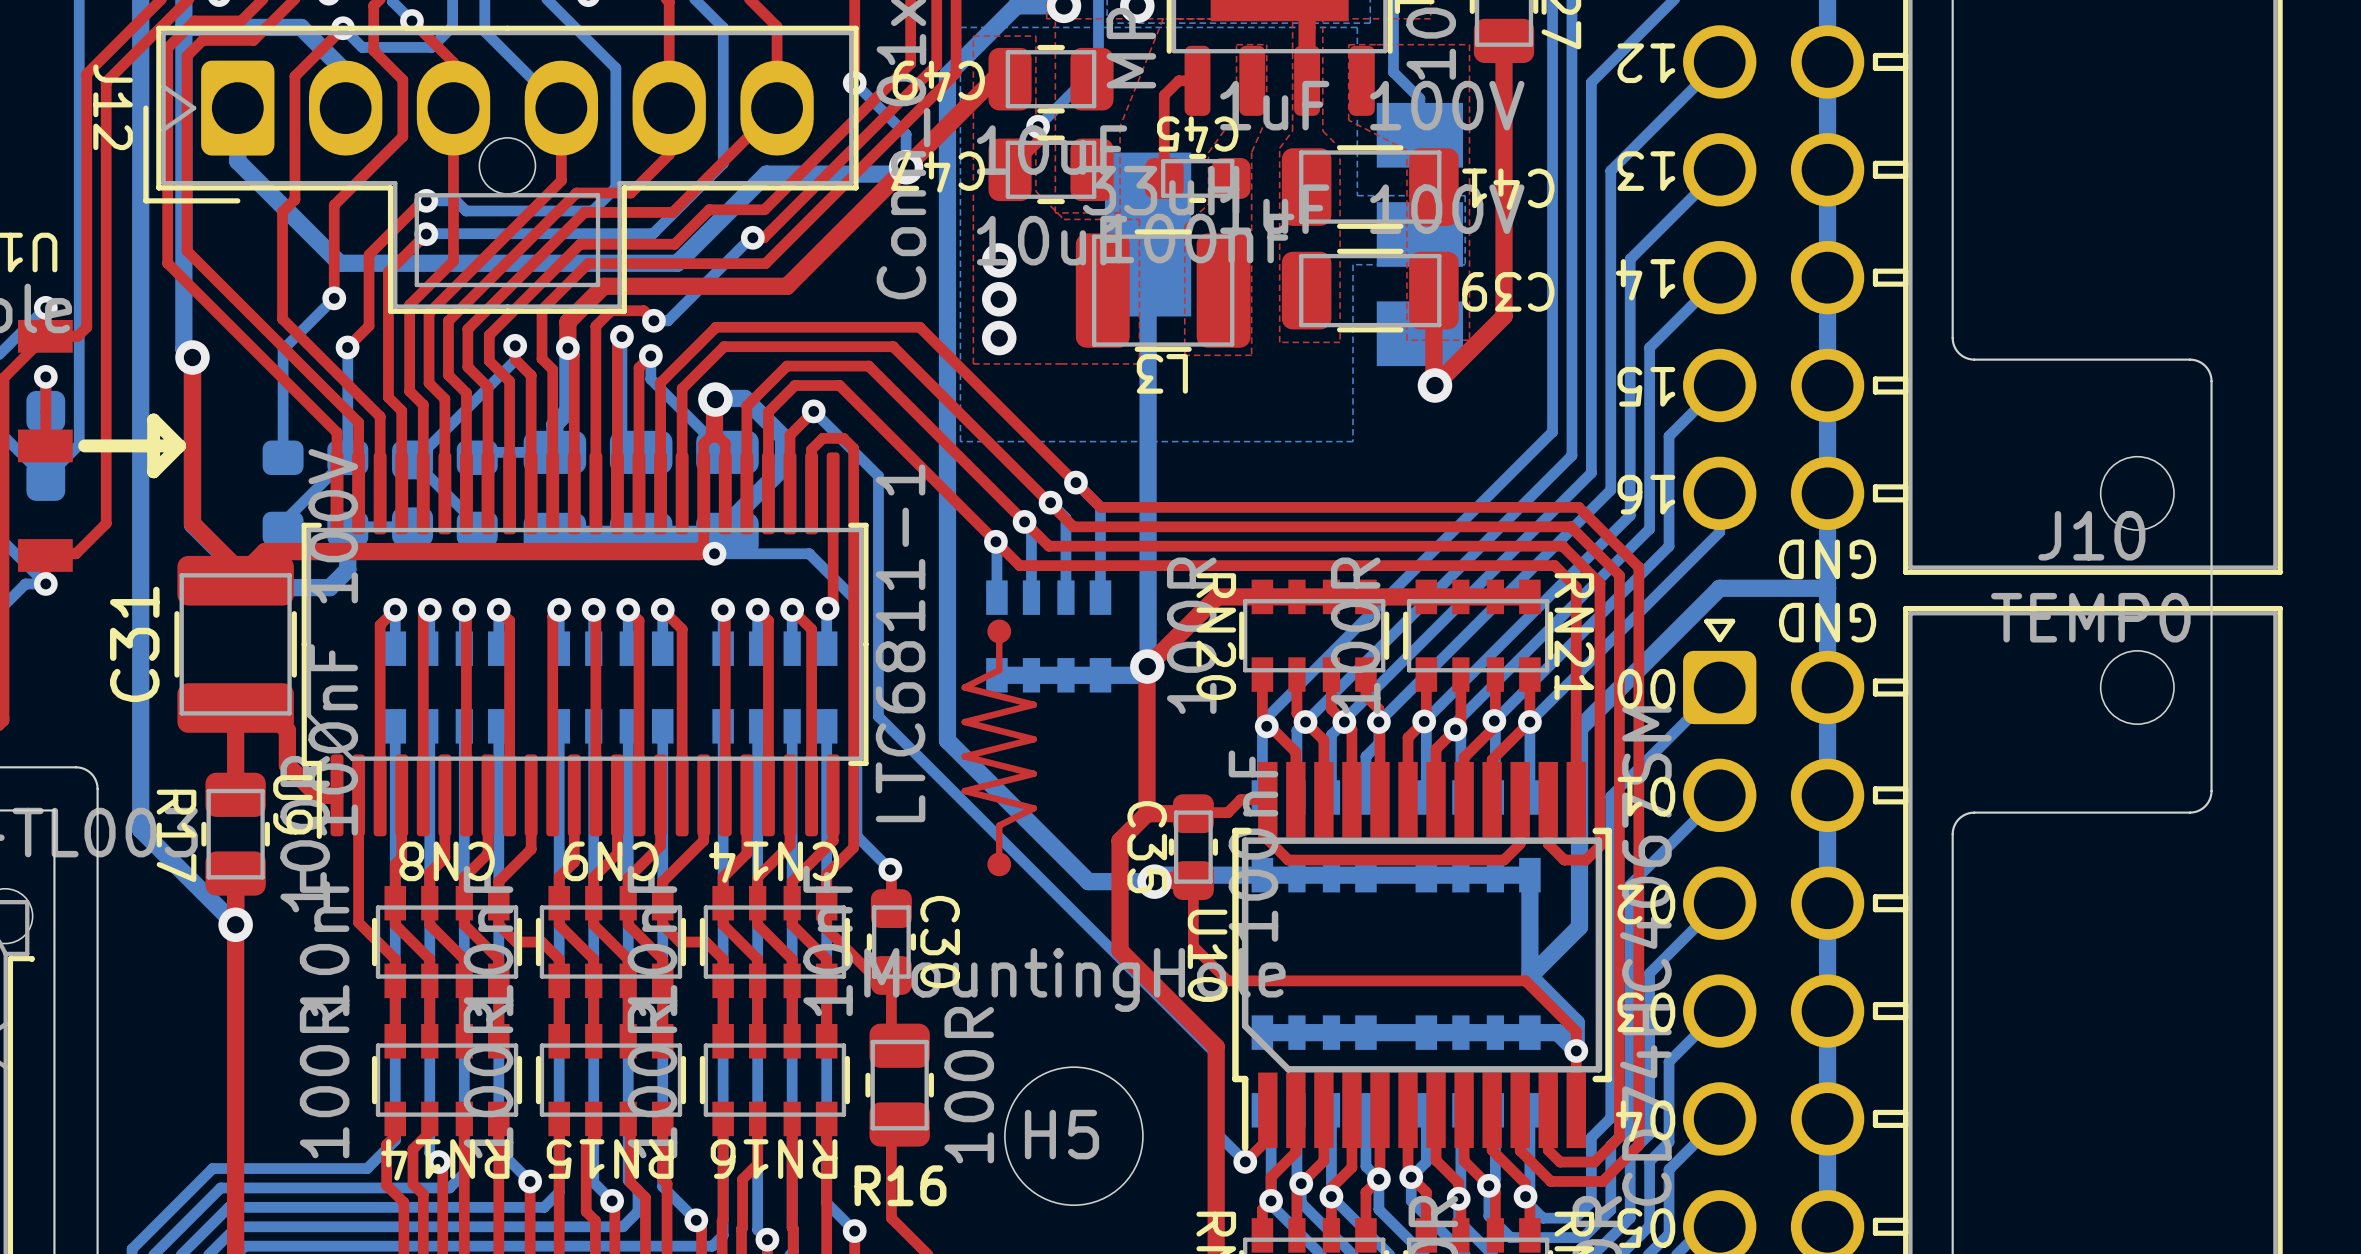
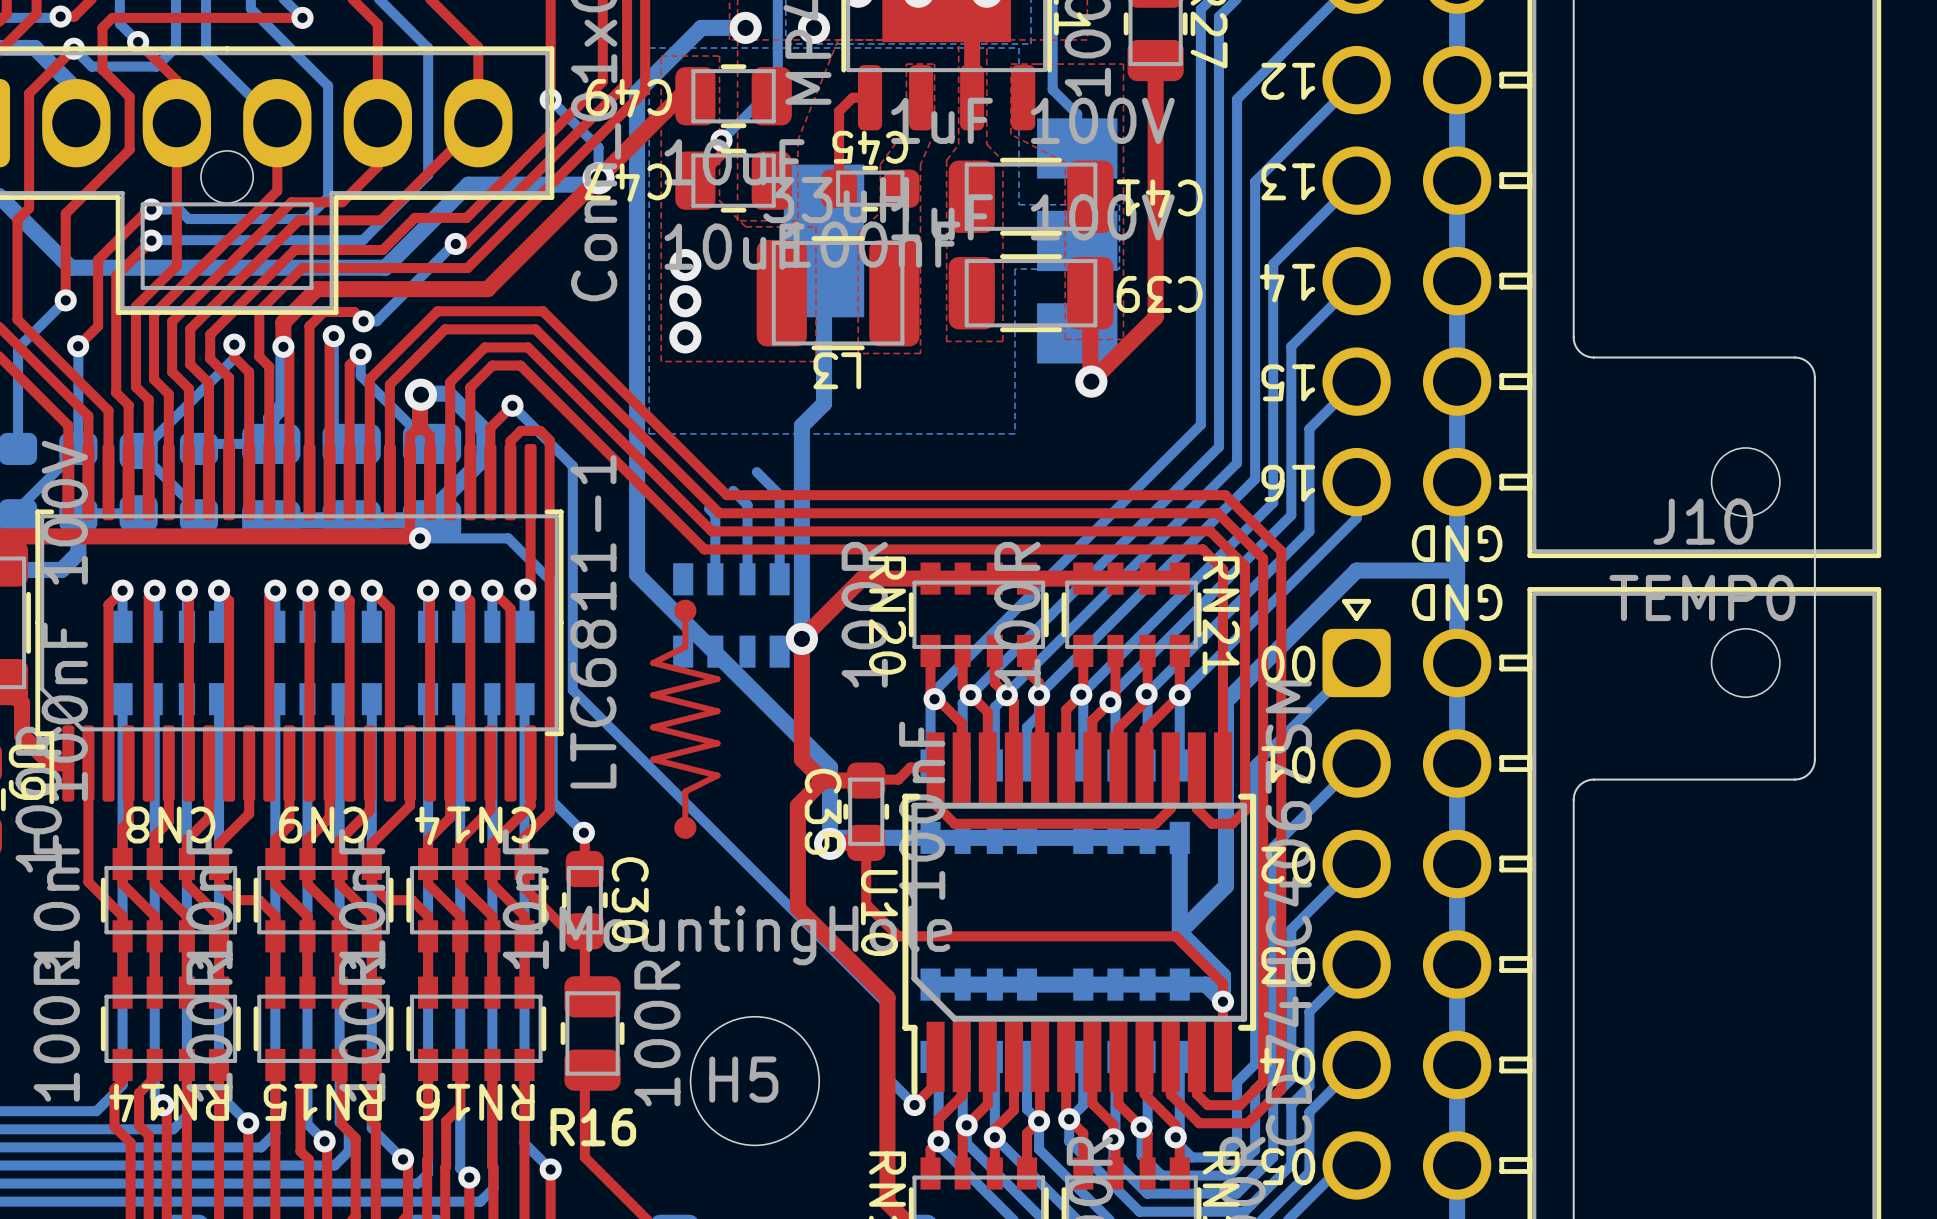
top track: (716, 327) (919, 327) (1075, 482) -> (421, 327) (437, 311) (543, 311) (726, 495) (779, 495)
top track: (724, 346) (893, 346) (1073, 526) -> (428, 345) (445, 329) (535, 329) (719, 513) (754, 513)
top track: (839, 385) (794, 385) (768, 412) -> (536, 381) (520, 365) (492, 365) (470, 387) (470, 406)
top track: (746, 406) (786, 366) (868, 366) (1048, 546) -> (450, 400) (450, 382) (484, 347) (528, 347) (711, 531) (731, 531)
bottom track: (1148, 409) (1148, 665) (1138, 675) (996, 675) -> (824, 403) (801, 425) (801, 638)
top track: (1075, 482) (1100, 507) -> none
via: (1075, 482) -> none
via: (1050, 502) -> none
via: (1024, 521) -> none
bottom track: (995, 541) (996, 597) -> none
via: (995, 541) -> none
bottom track: (947, 592) (947, 740) (1088, 881) (1154, 881) -> (637, 574) (830, 767) (830, 843)
top track: (1216, 596) (1147, 666) (1147, 813) -> (888, 578) (862, 578) (801, 638) (801, 759) (823, 780)
via position: (1147, 666) -> (801, 638)

